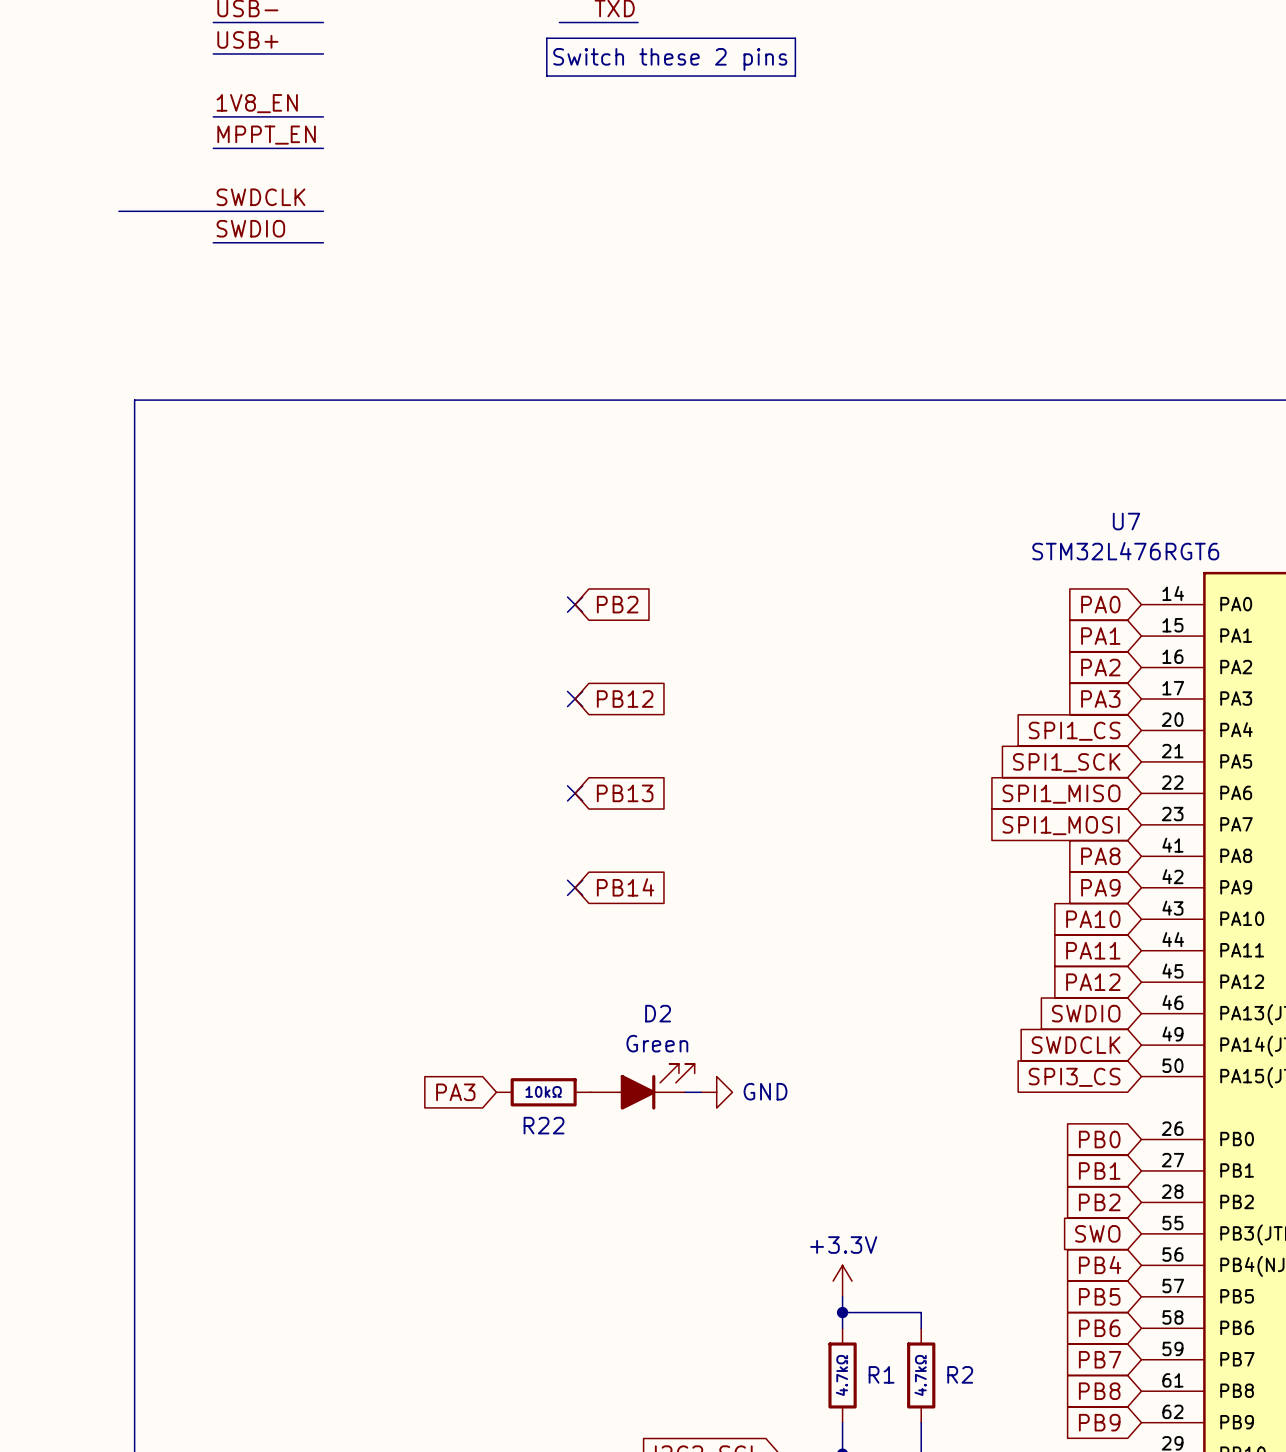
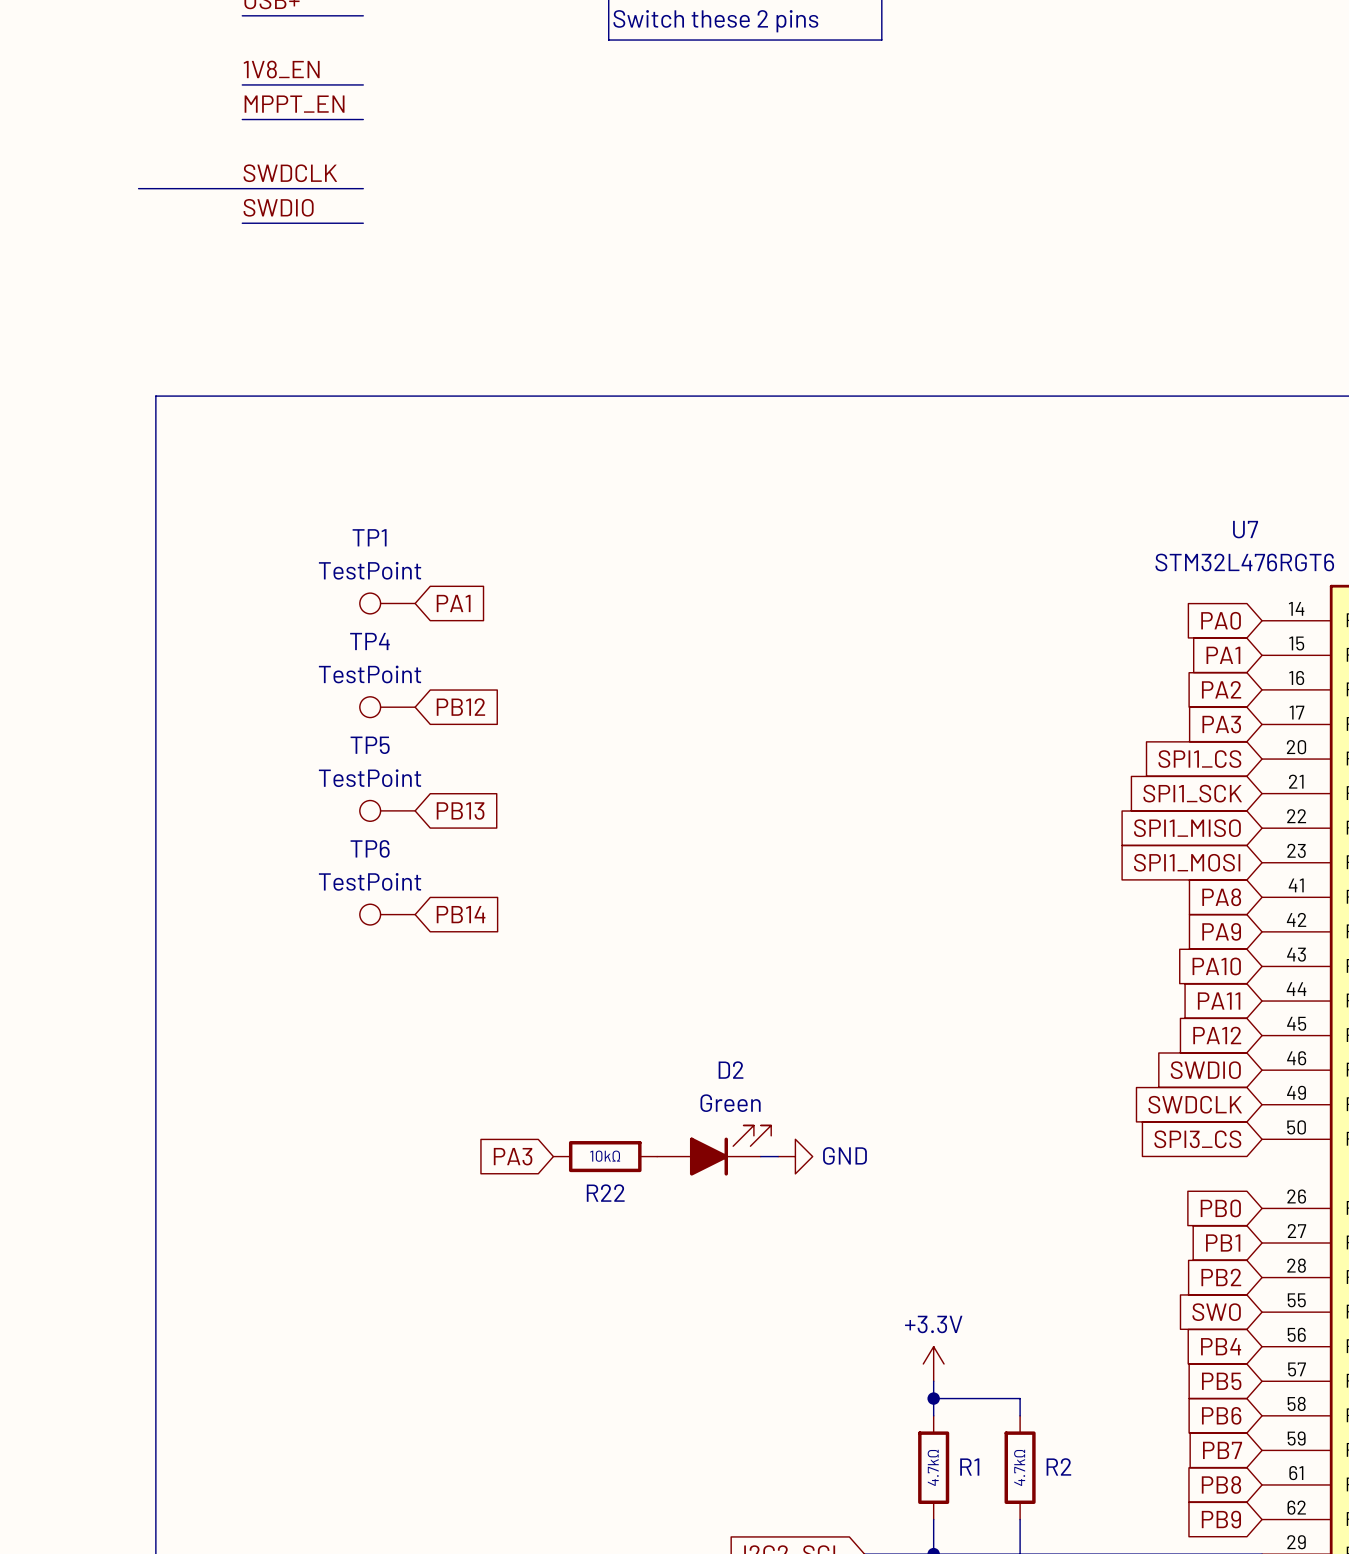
TP1: none -> TestPoint (387, 603)
global label: none -> PA1 (453, 603)
no-connect mark: (575, 604) -> none
global label: PB2 (617, 604) -> none
TP4: none -> TestPoint (387, 707)
no-connect mark: (575, 699) -> none
global label position: PB12 (625, 699) -> PB12 (460, 707)
TP5: none -> TestPoint (387, 810)
no-connect mark: (575, 793) -> none
global label position: PB13 (625, 793) -> PB13 (460, 810)
TP6: none -> TestPoint (387, 914)
no-connect mark: (575, 887) -> none
global label position: PB14 (625, 887) -> PB14 (461, 914)

